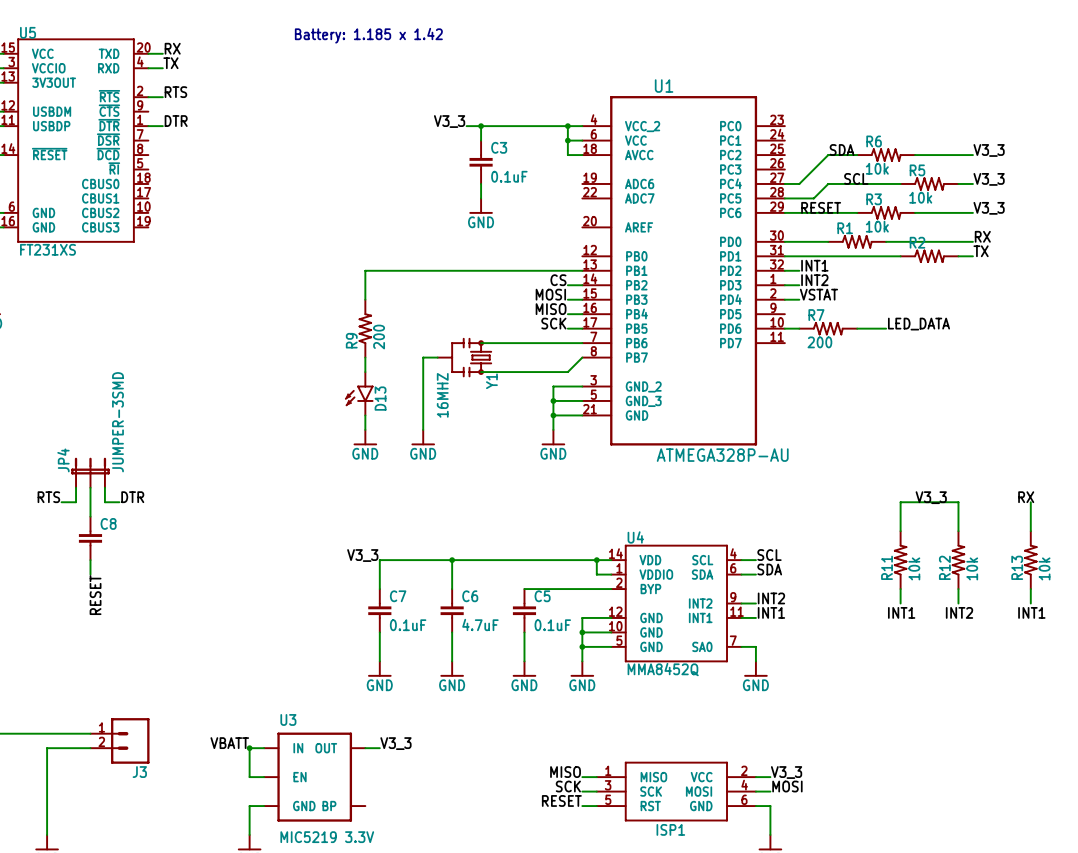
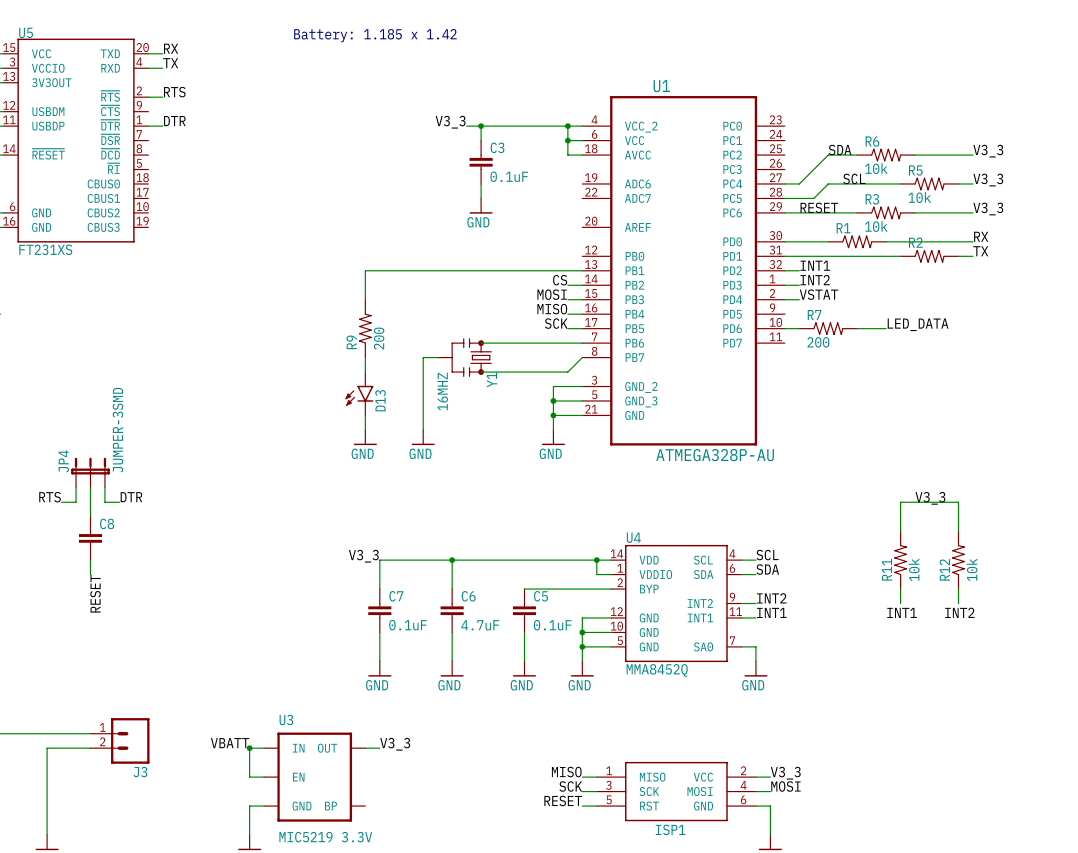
label: RX (1026, 497) -> none
wire: (1030, 502) (1030, 531) -> none
R13: 10k (1030, 560) -> none
wire: (1030, 589) (1030, 603) -> none
label: INT1 (1031, 612) -> none

